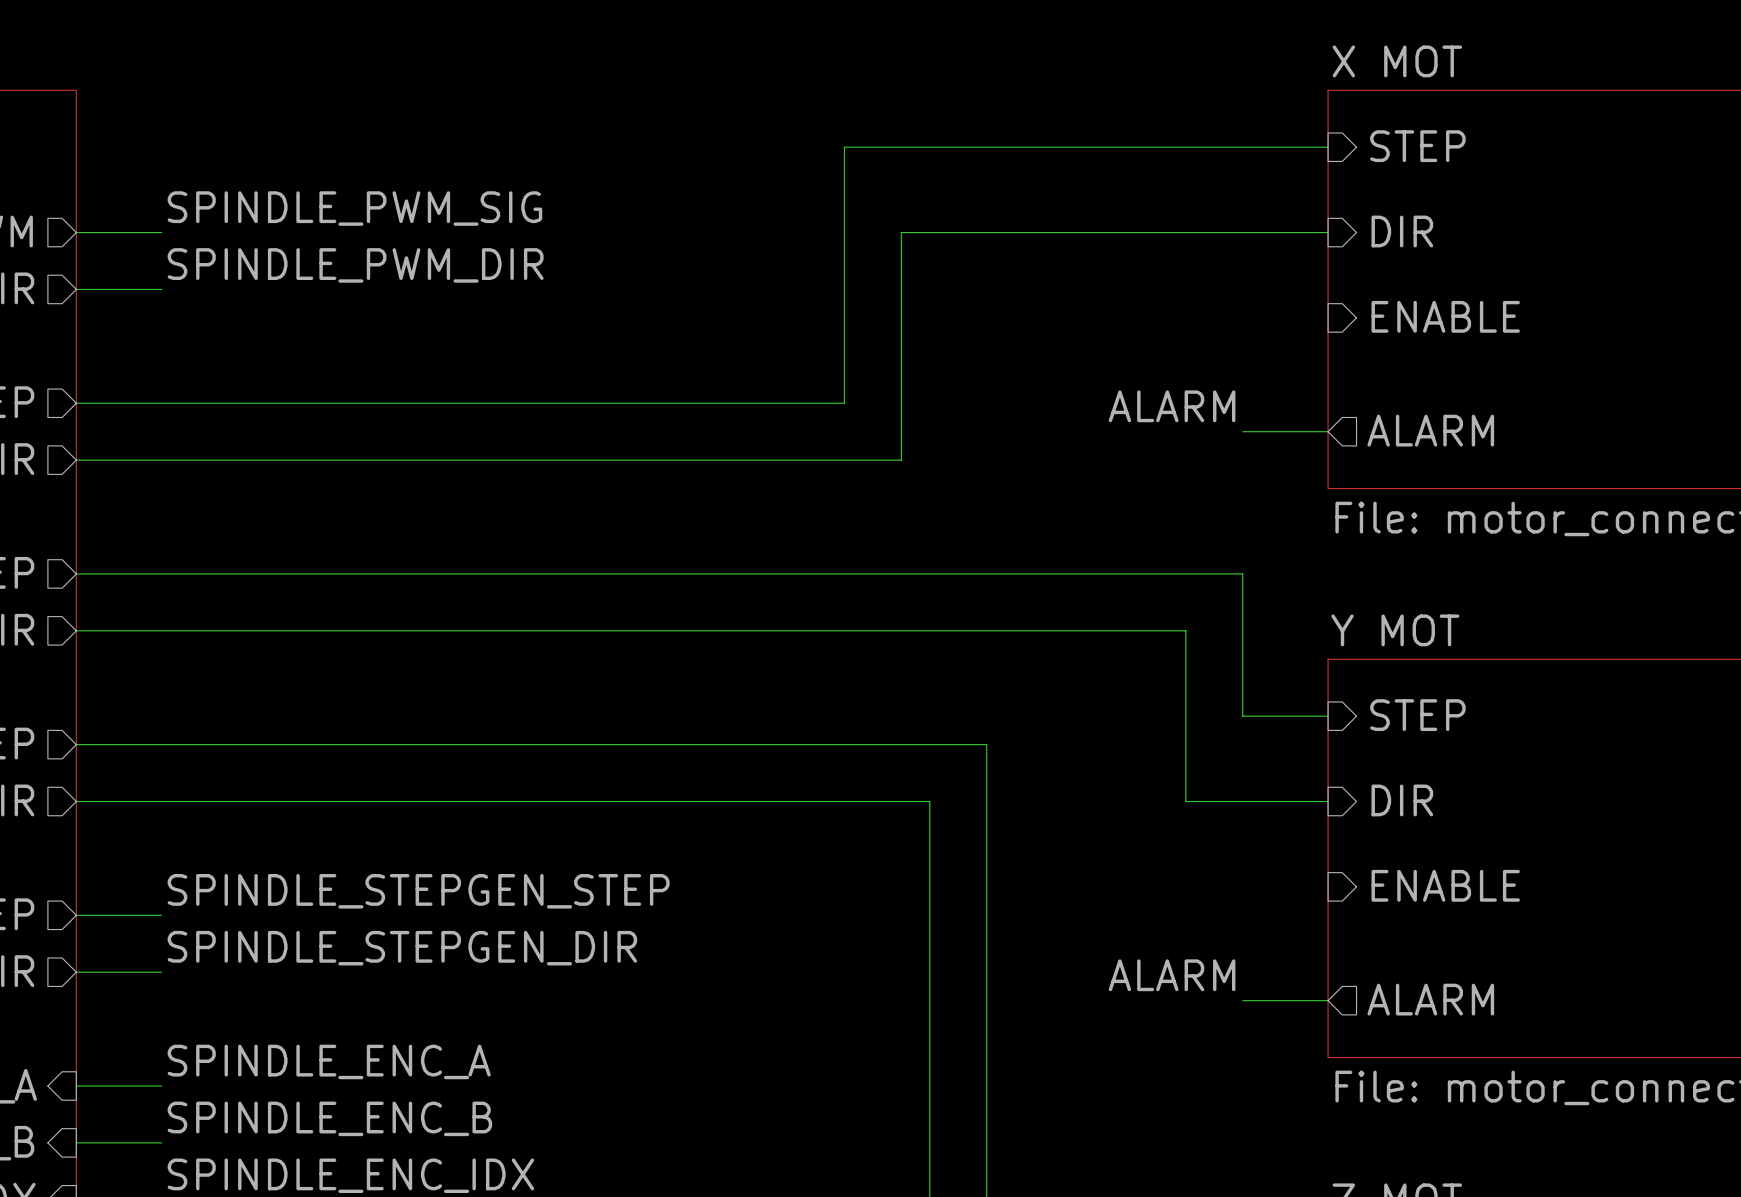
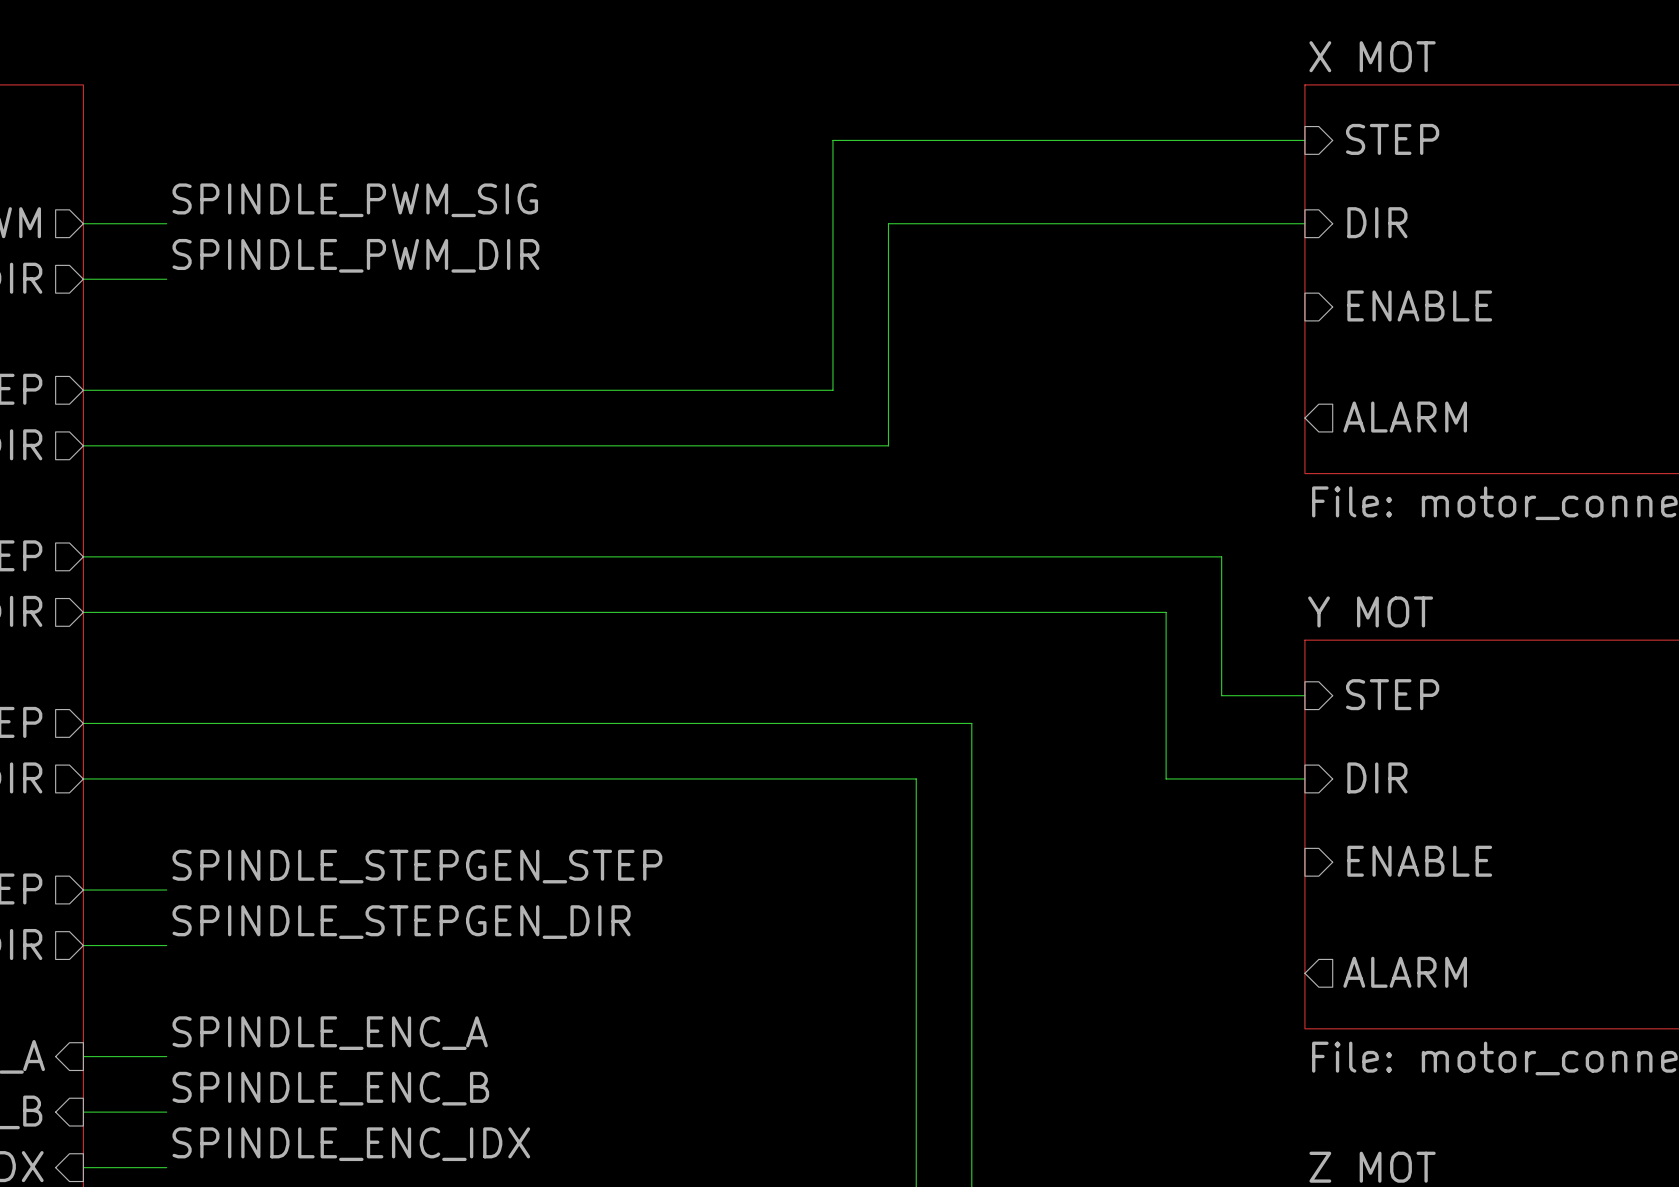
label: ALARM (1172, 406) -> none
wire: (1242, 431) (1328, 431) -> none
label: ALARM (1172, 975) -> none
wire: (1242, 1000) (1328, 1000) -> none

